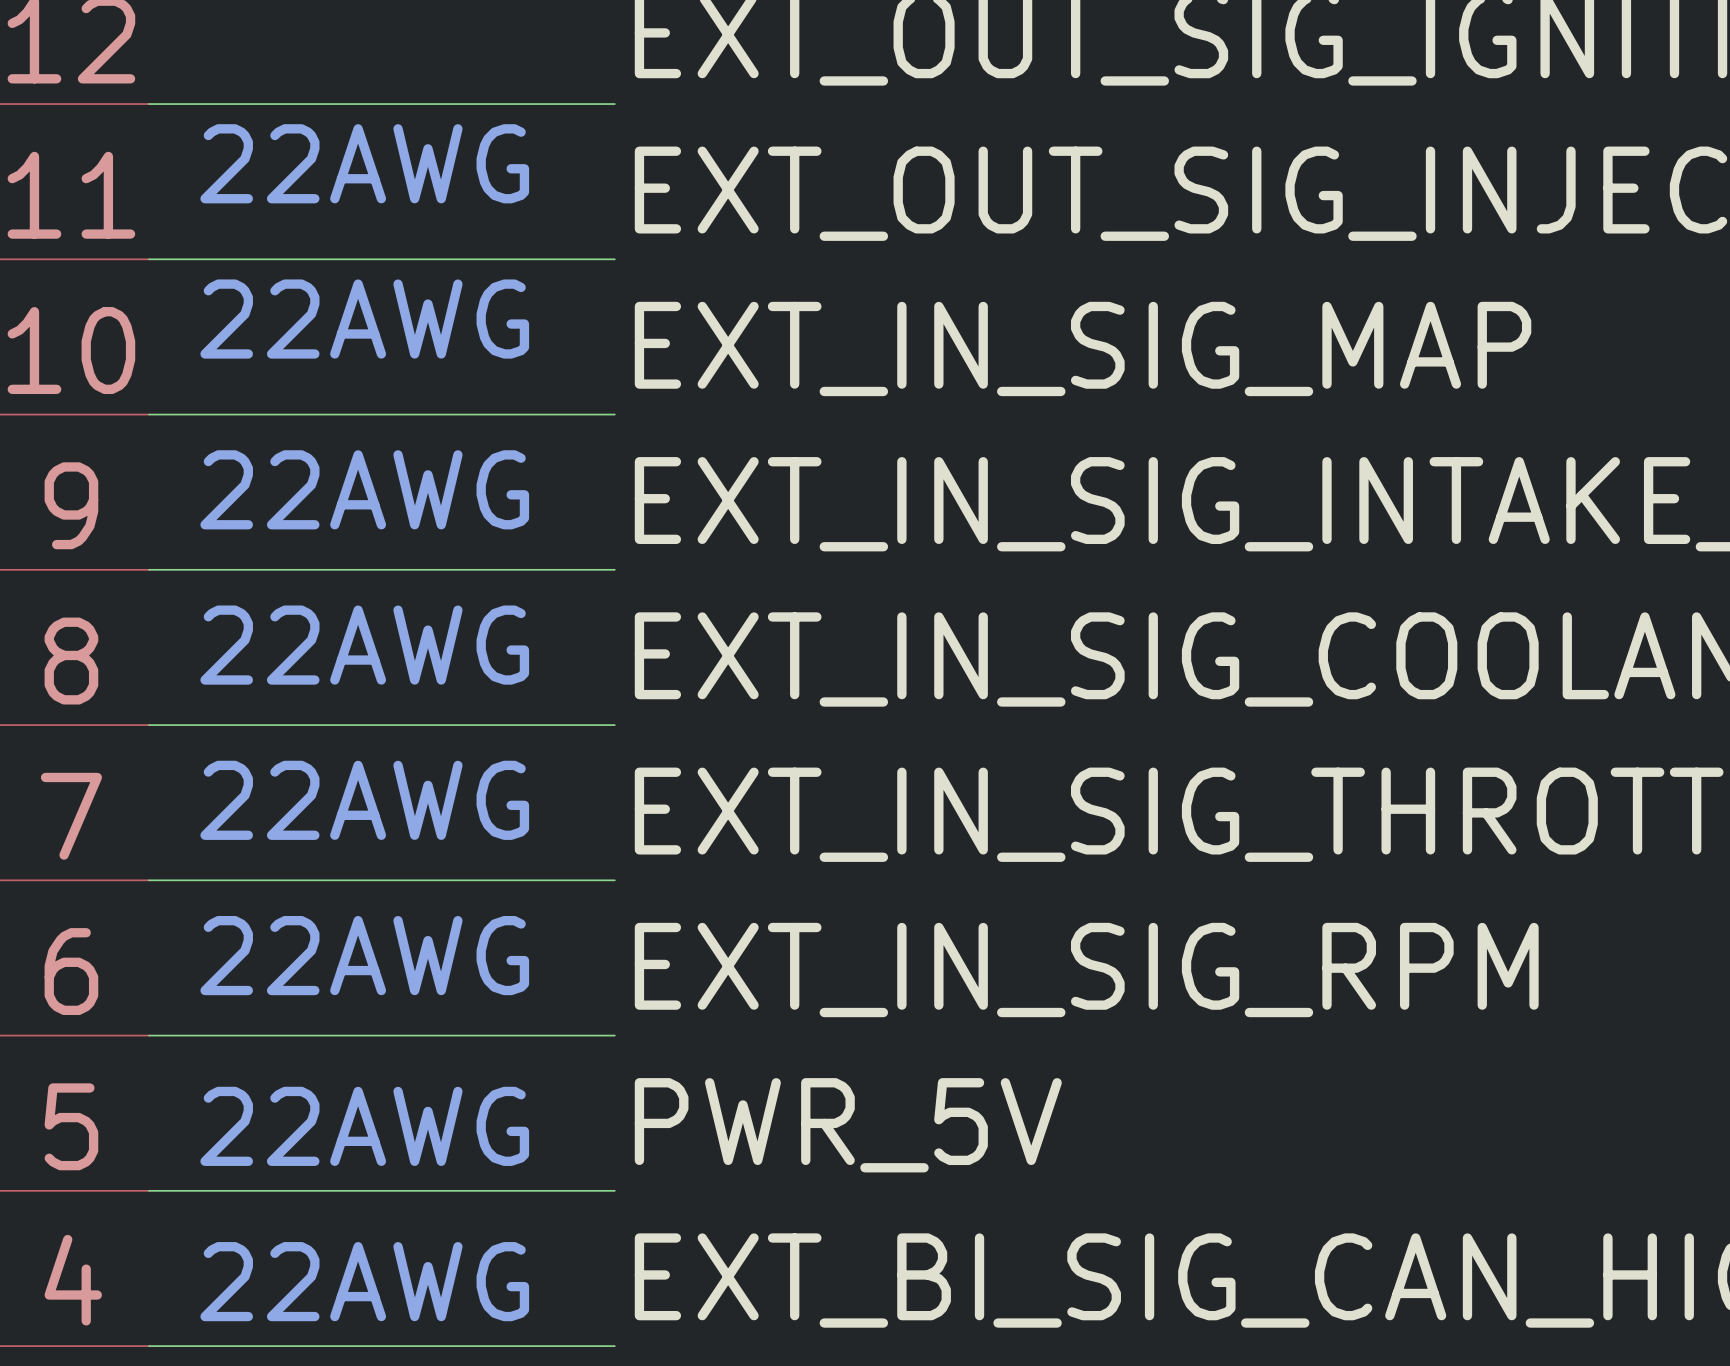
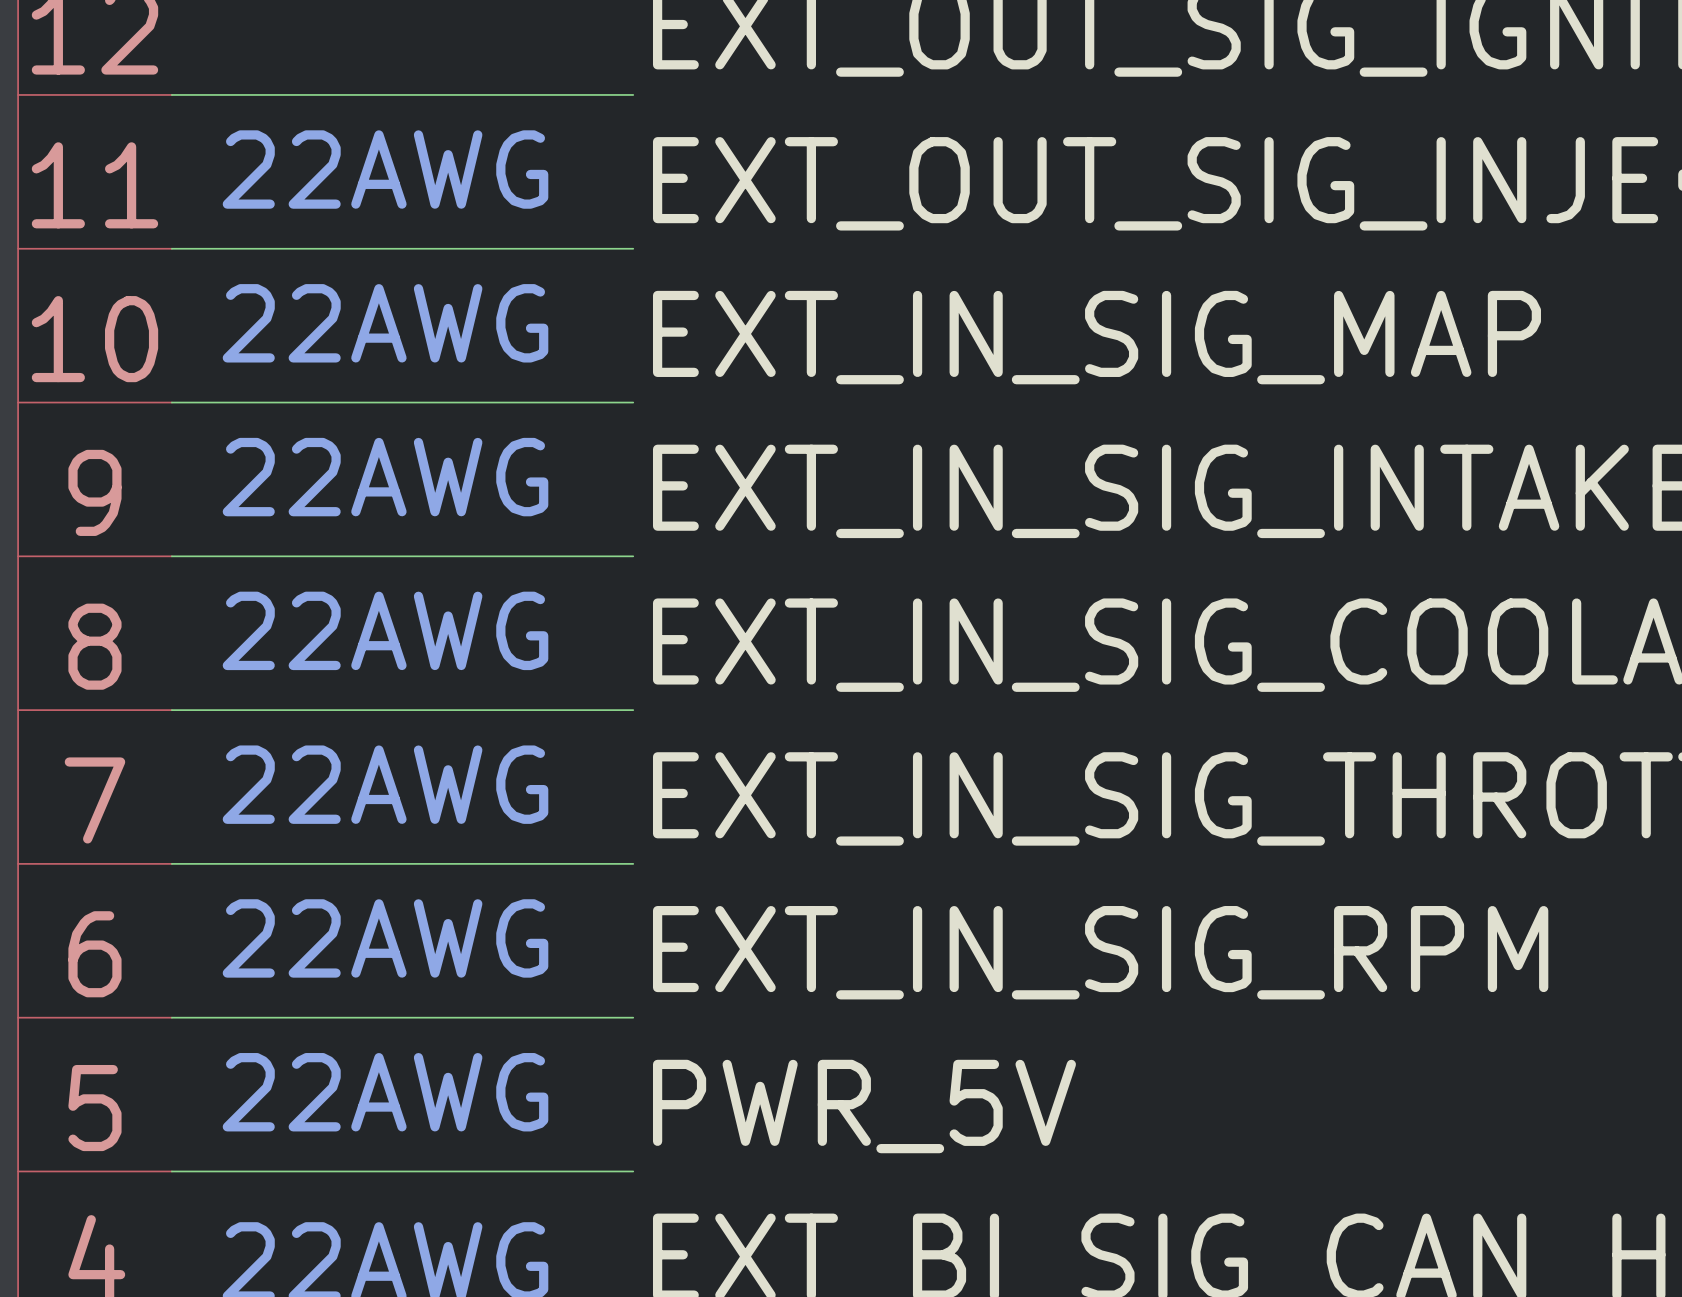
text position: 22AWG (364, 163) -> 22AWG (385, 169)
text position: 22AWG (364, 319) -> 22AWG (385, 323)
text position: 22AWG (364, 1126) -> 22AWG (385, 1092)

